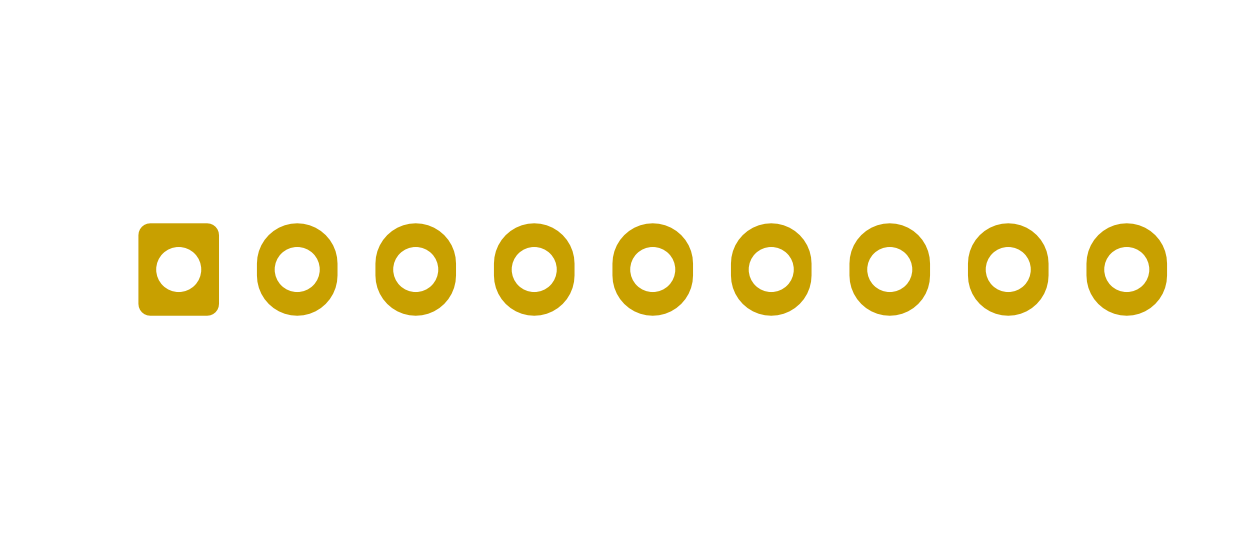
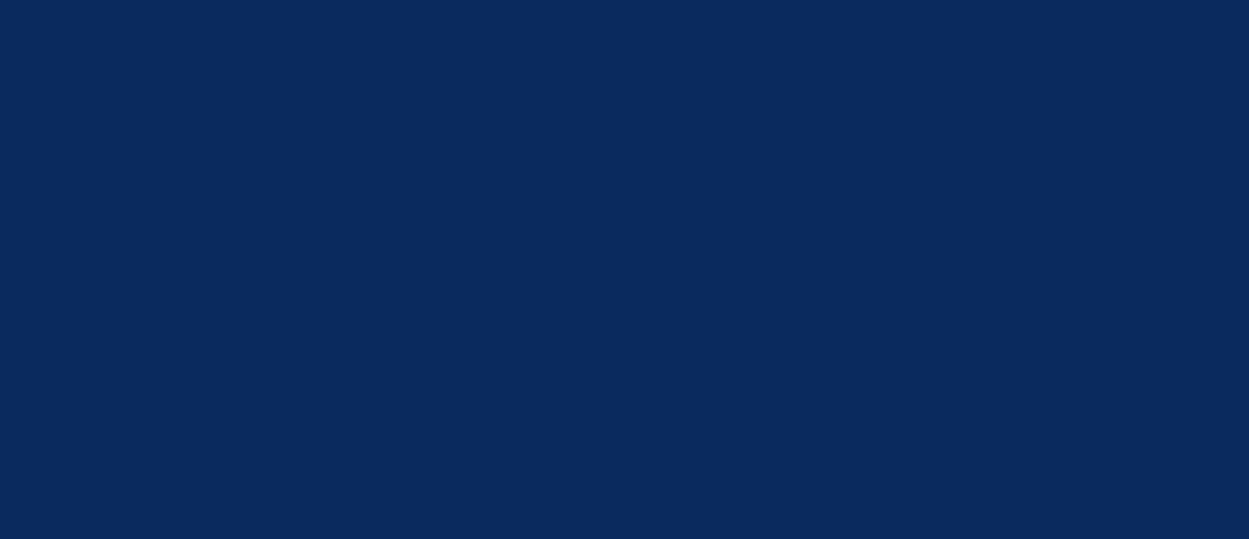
part: (652, 269) -> none

